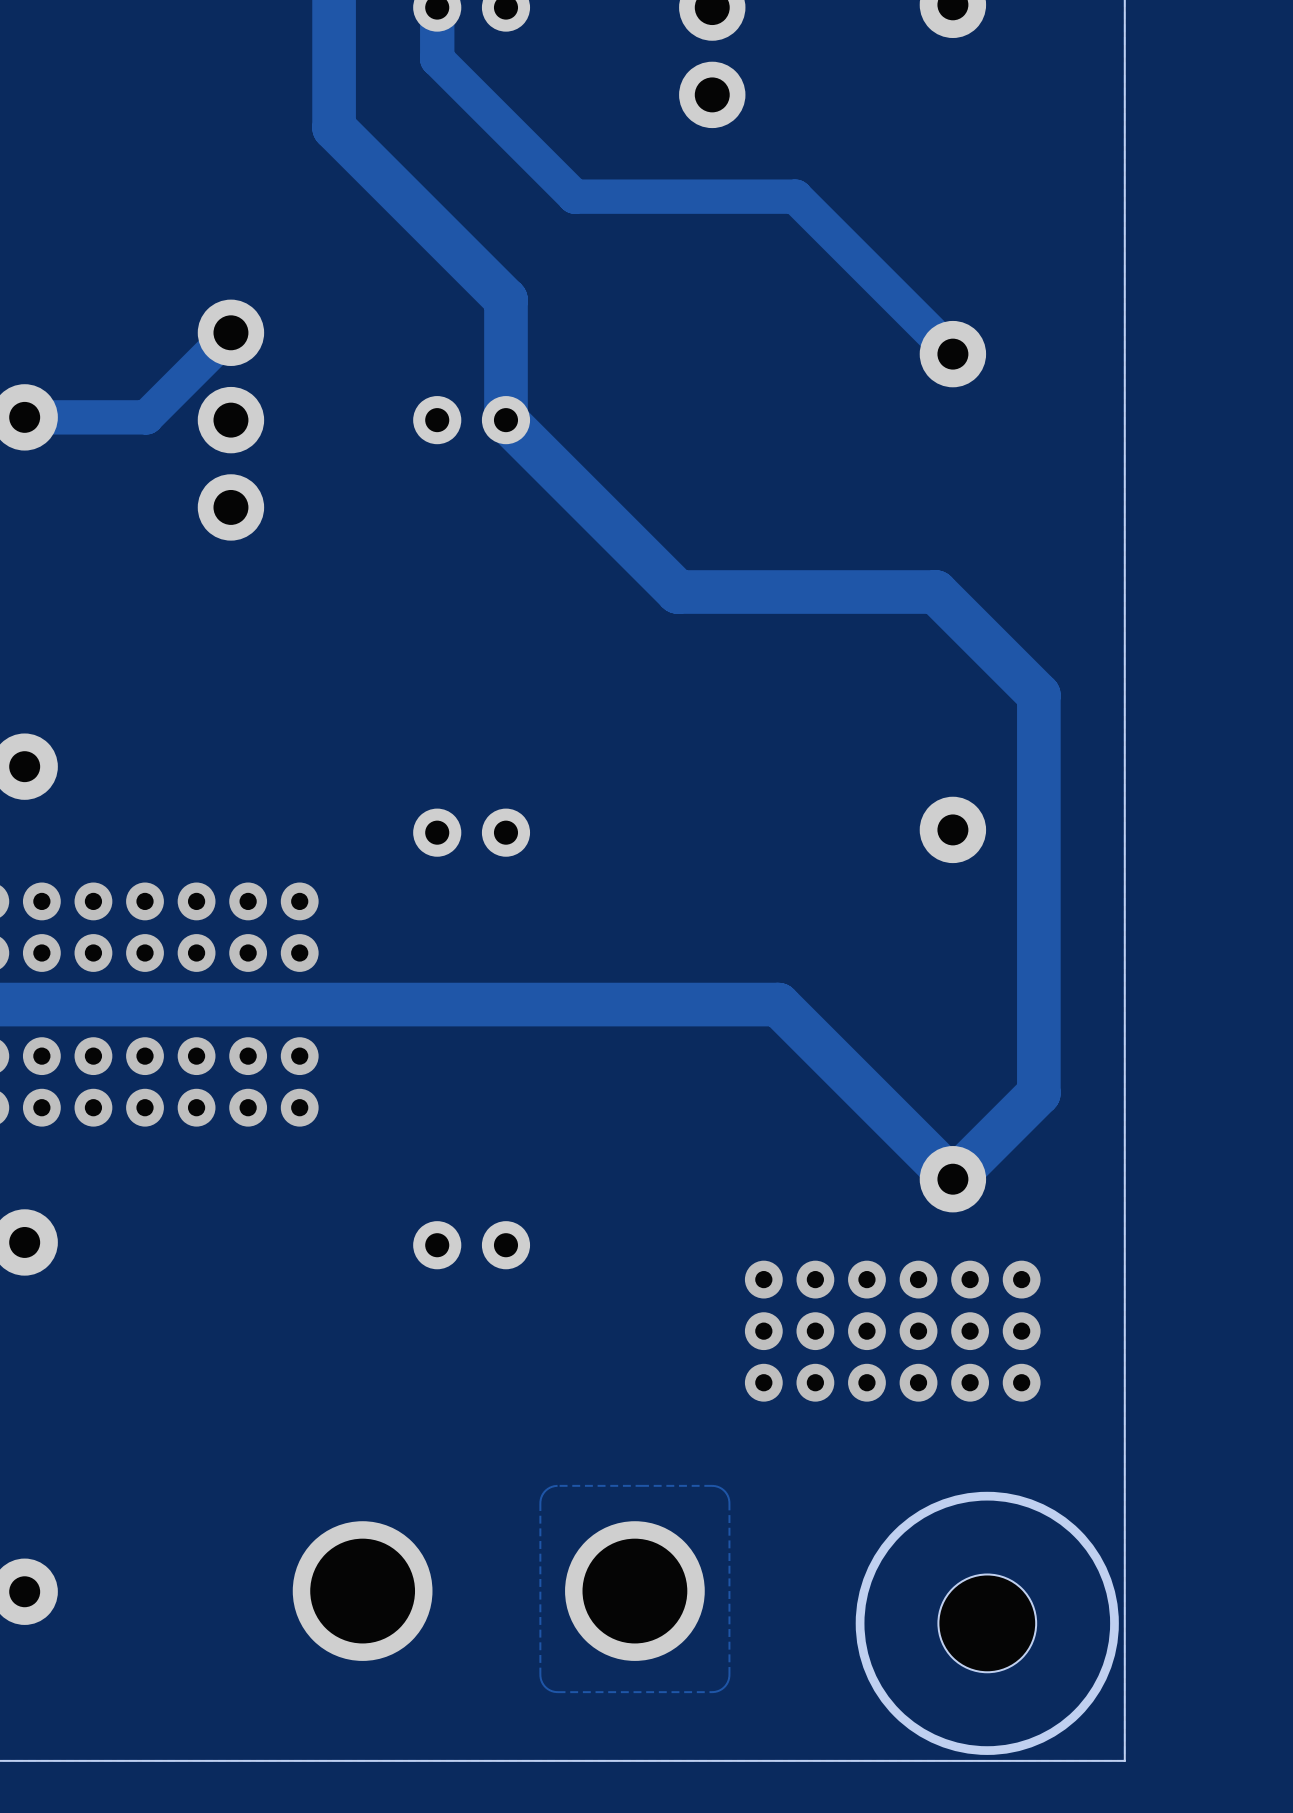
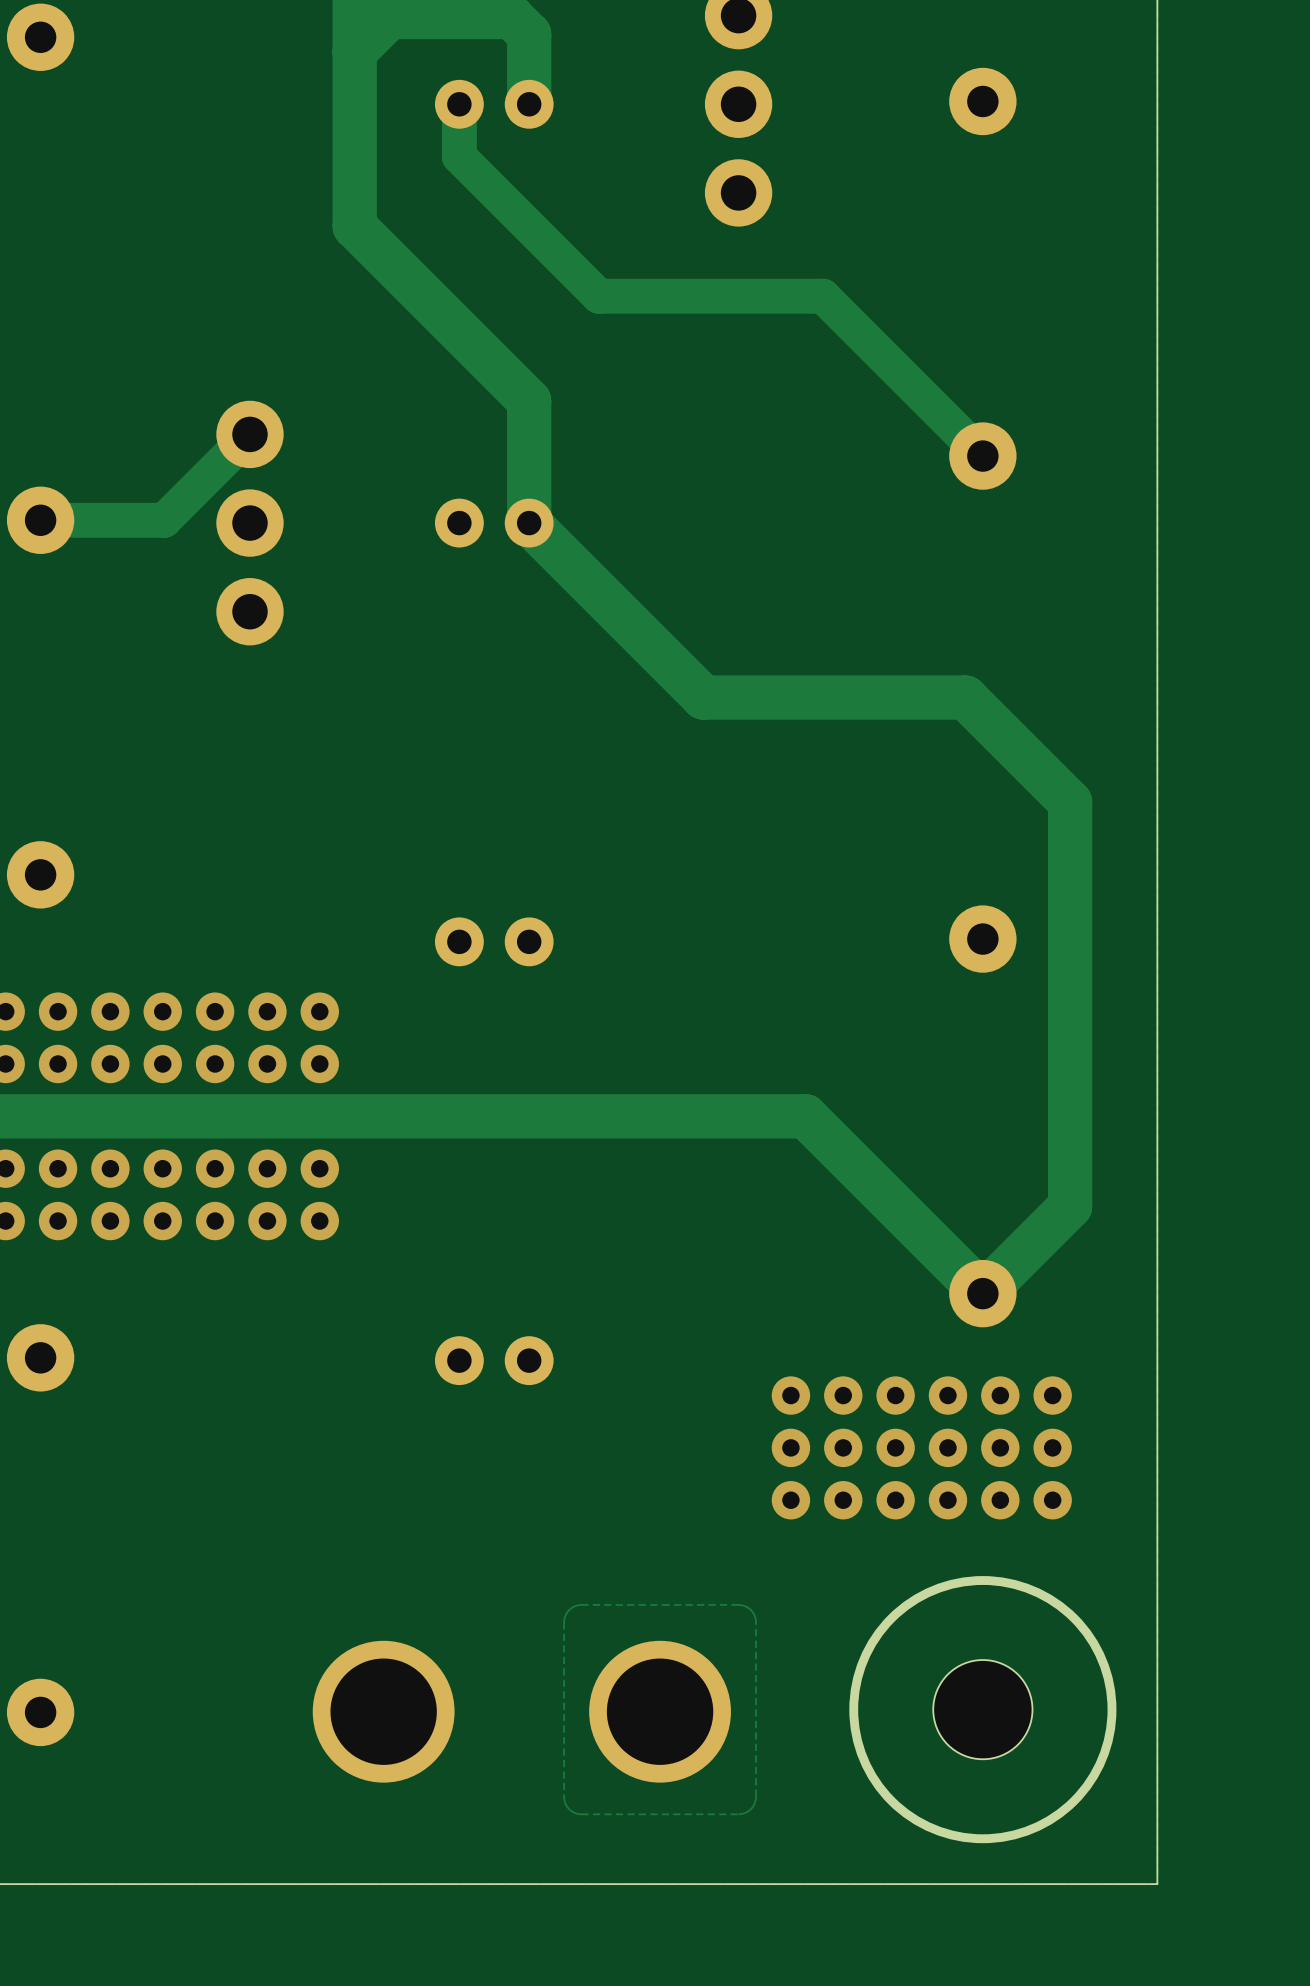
round board edge position: (987, 1623) -> (982, 1709)
hole position: (987, 1623) -> (982, 1709)

